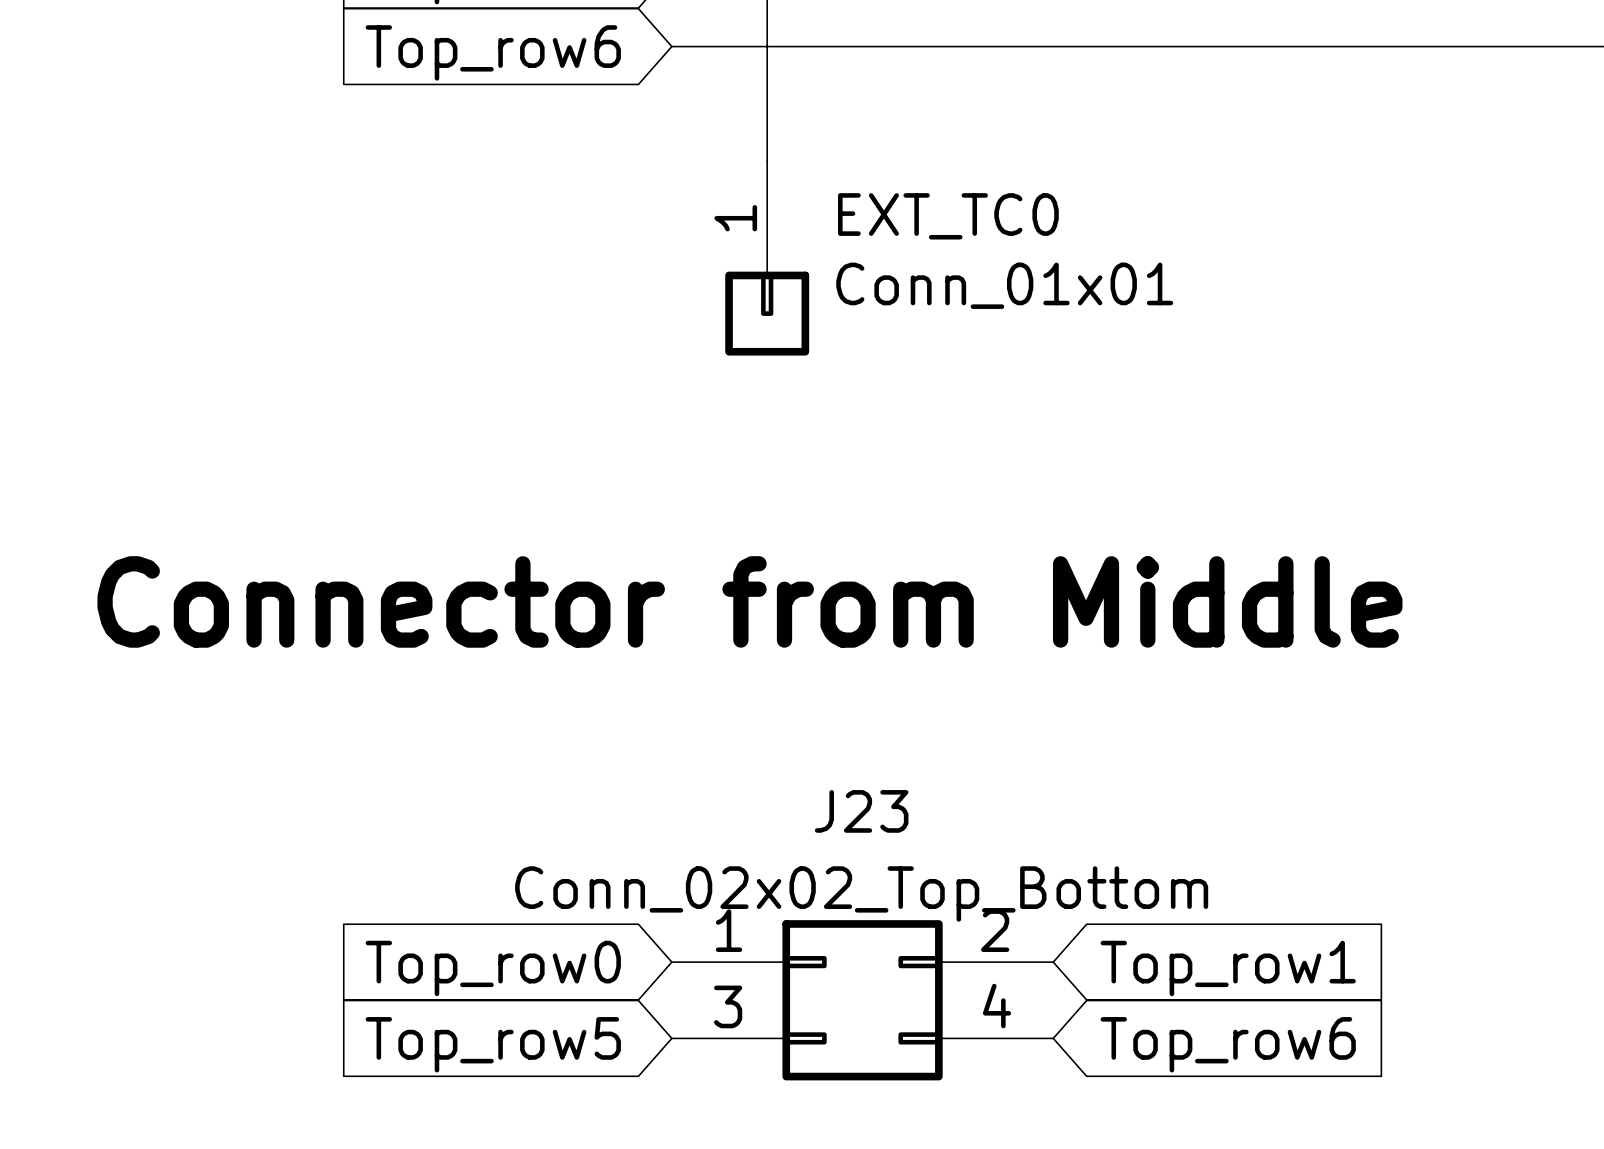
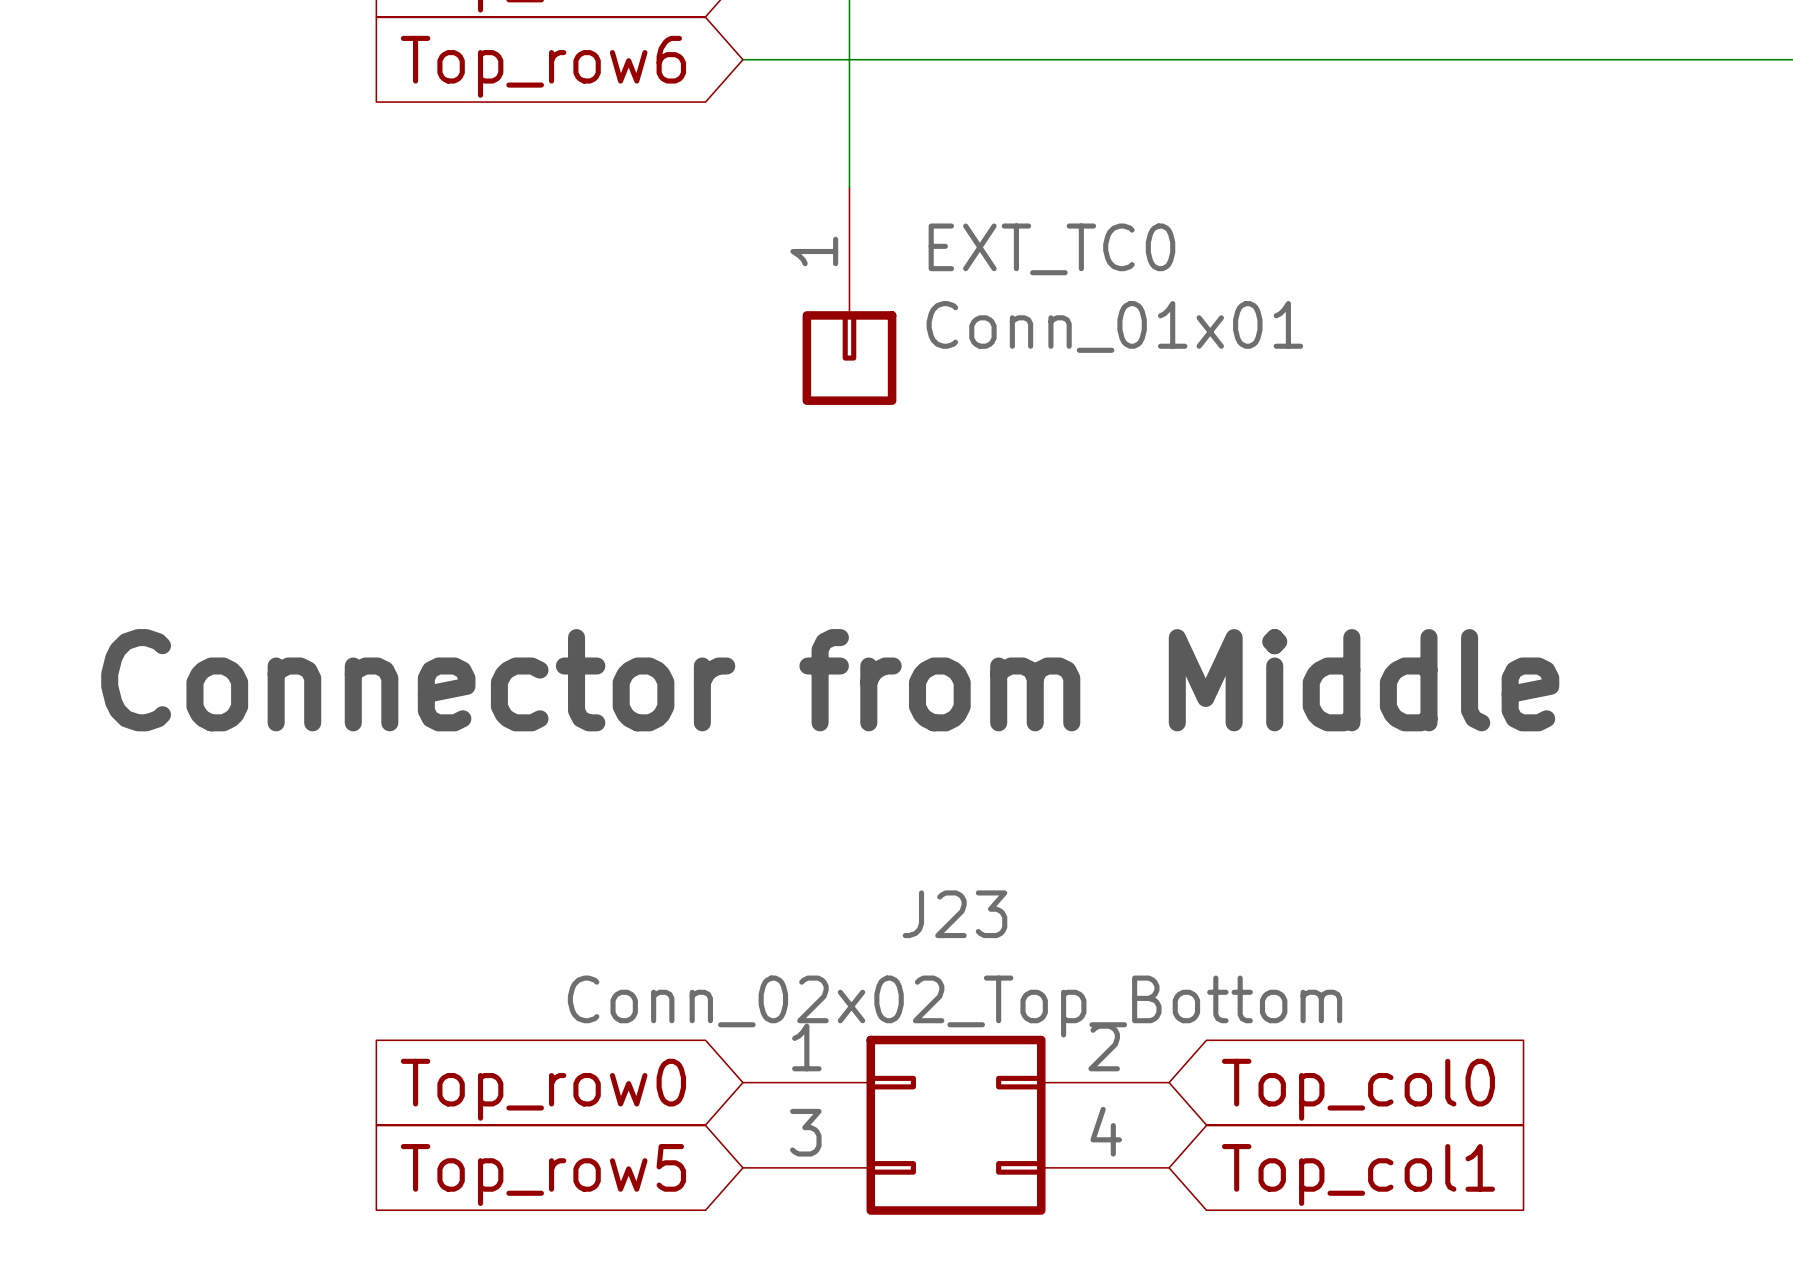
global label: Top_row1 (1228, 968) -> Top_col0 (1358, 1089)
global label: Top_row6 (1228, 1044) -> Top_col1 (1358, 1174)

